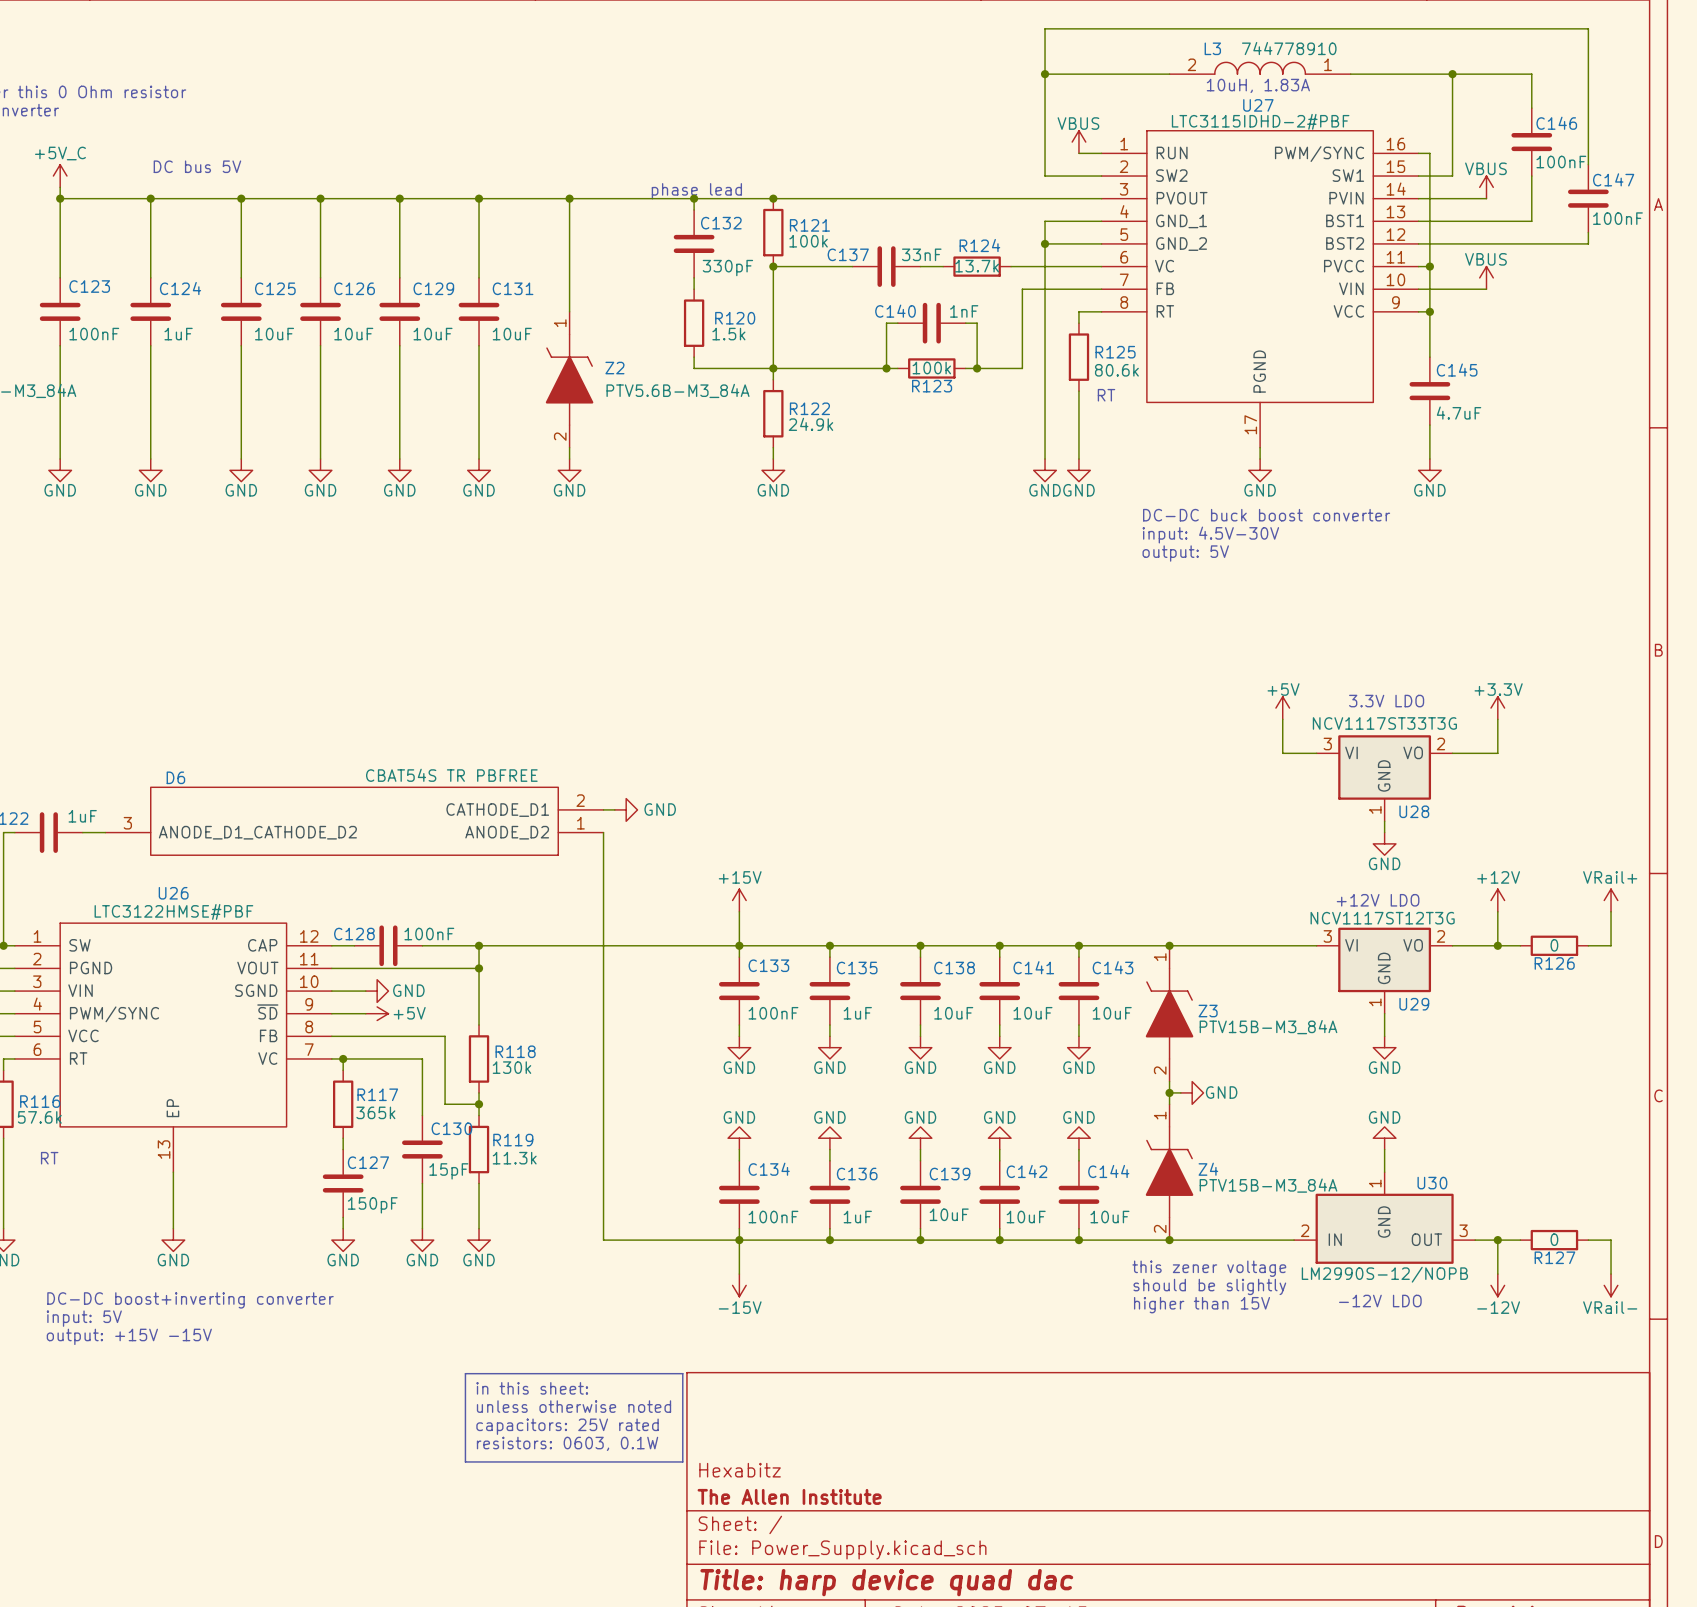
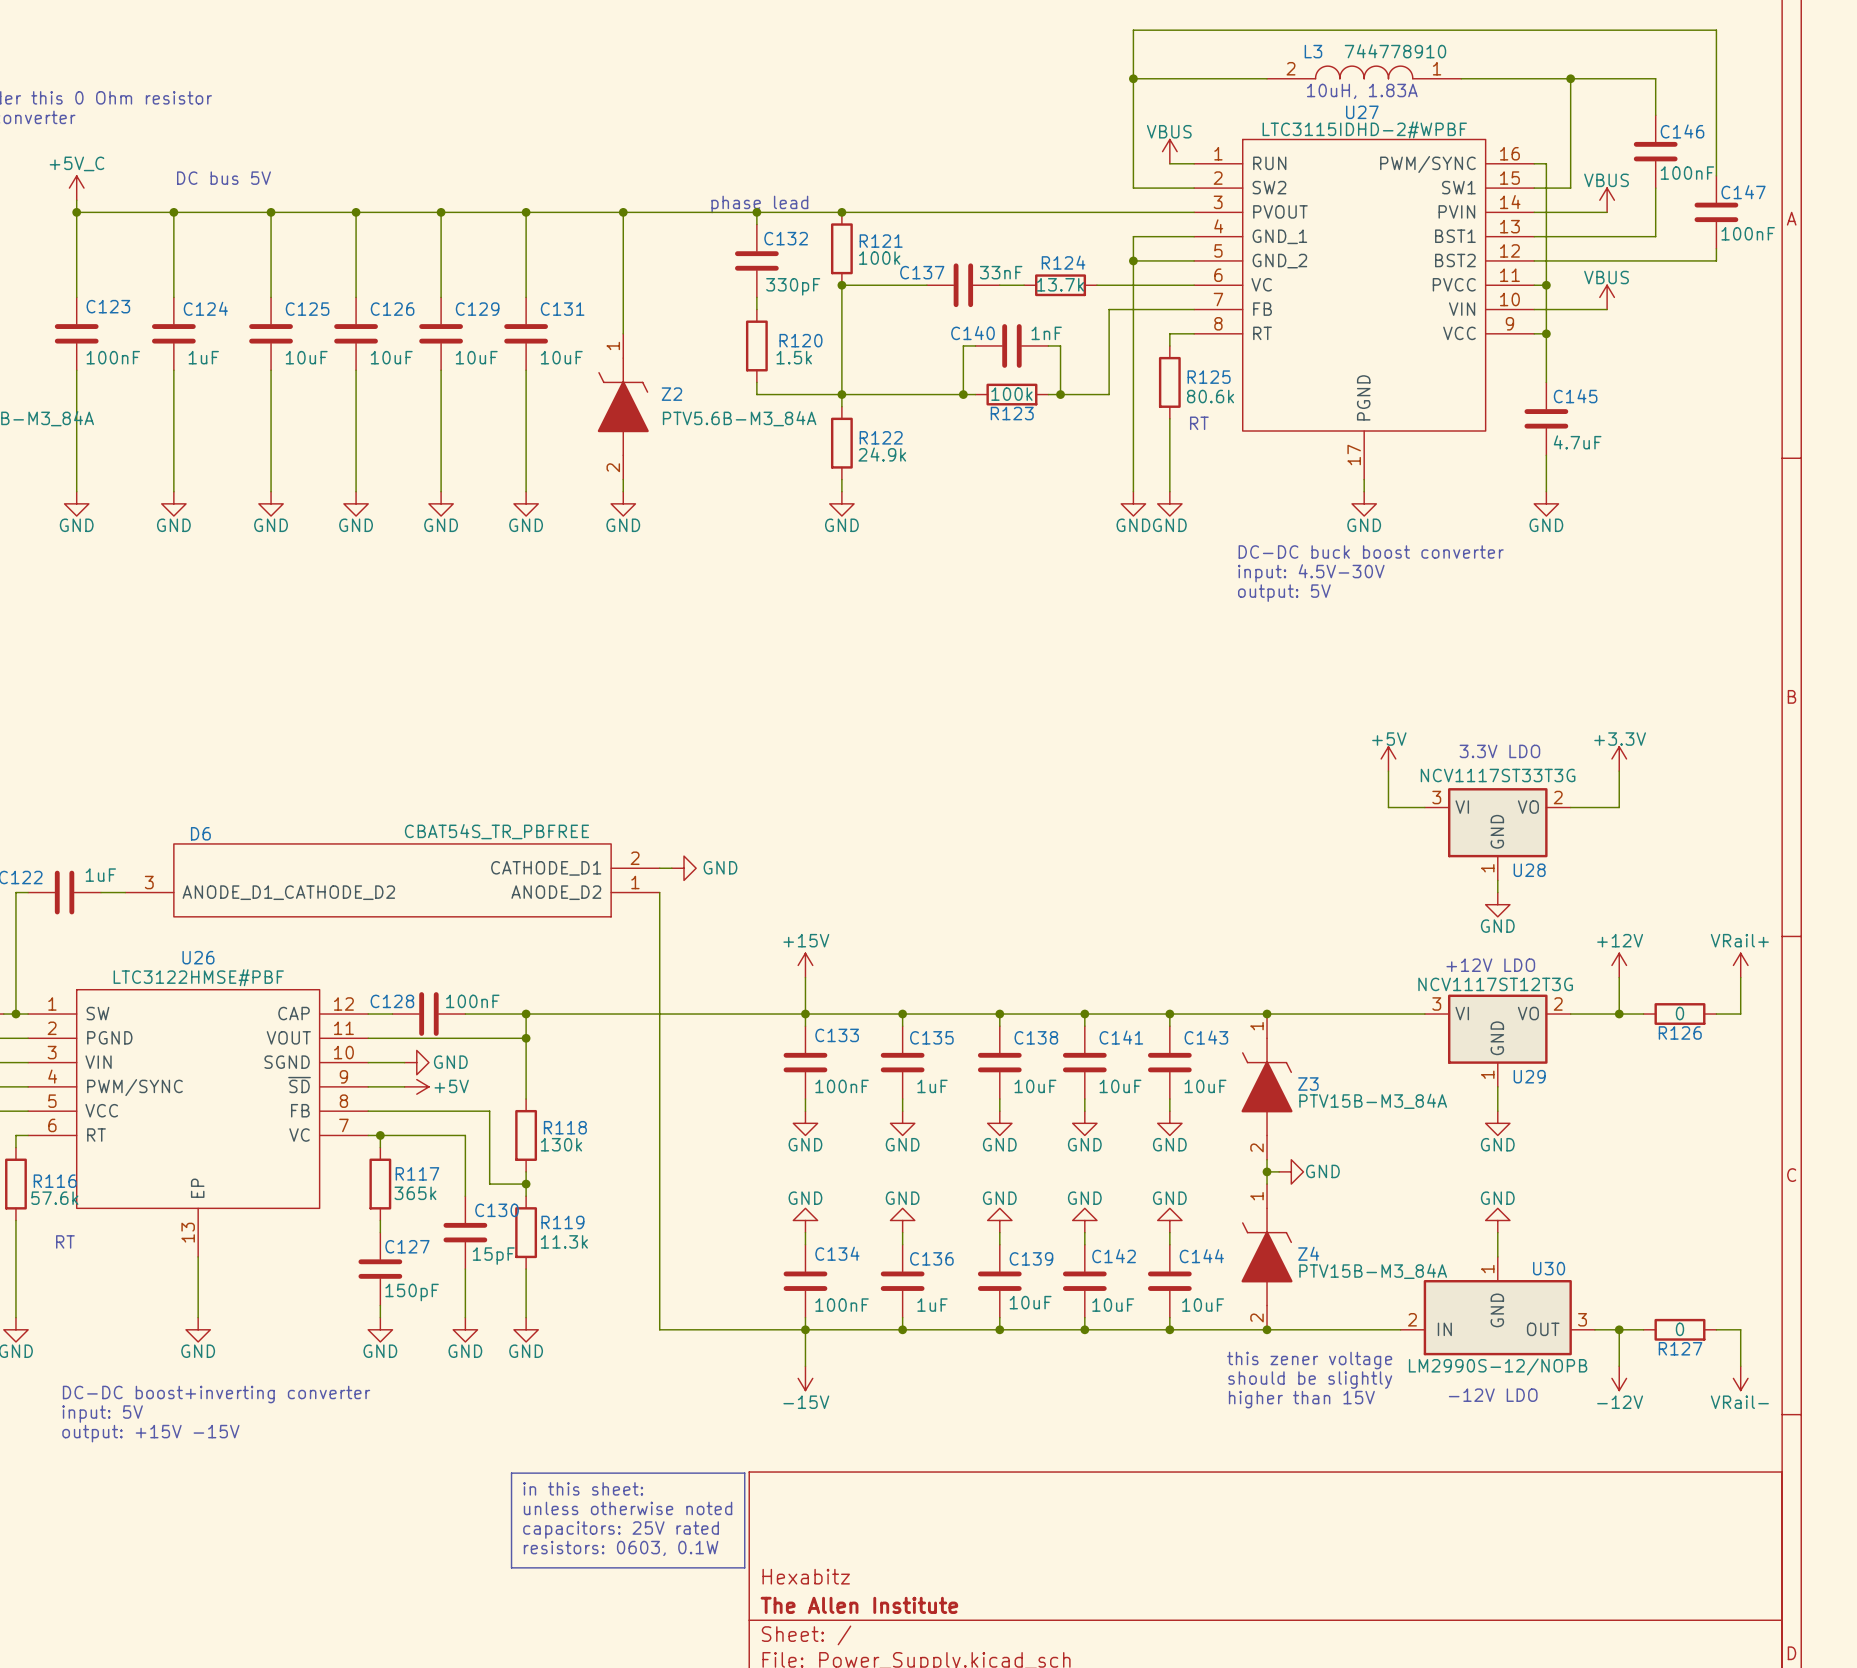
U27 value: LTC3115IDHD-2#PBF (1260, 121) -> LTC3115IDHD-2#WPBF (1364, 129)
D6 value: CBAT54S TR PBFREE (451, 775) -> CBAT54S_TR_PBFREE (496, 831)

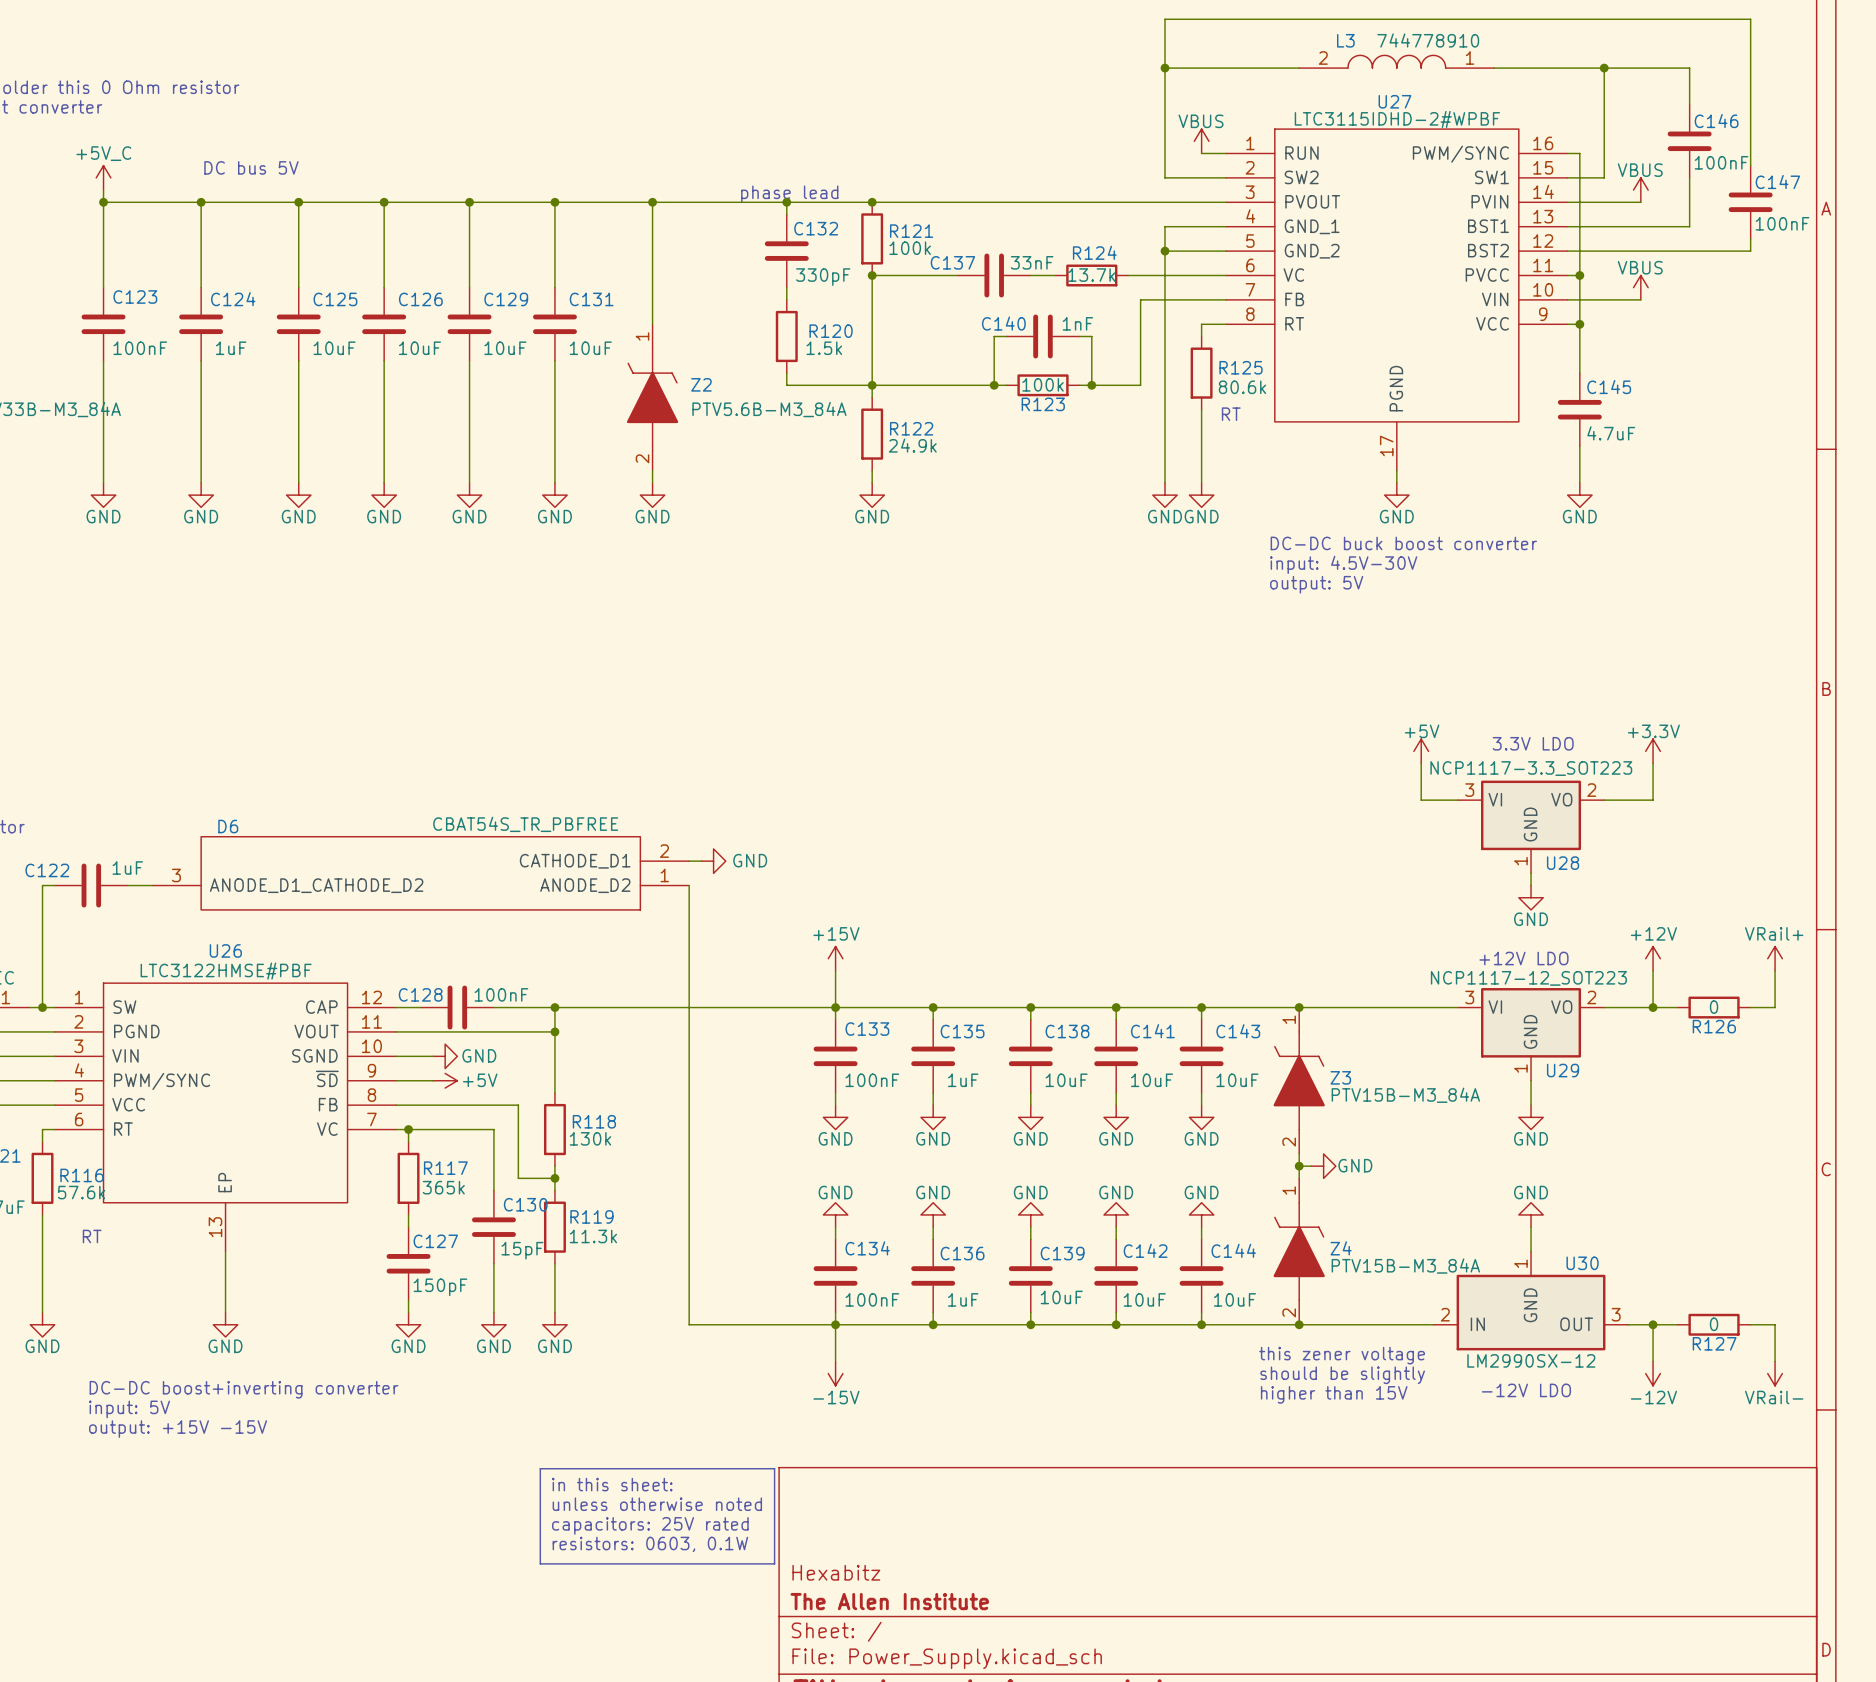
text: 10uH, 1.83A (1362, 91) -> none
U28 value: NCV1117ST33T3G (1498, 775) -> NCP1117-3.3_SOT223 (1531, 768)
U29 value: NCV1117ST12T3G (1495, 984) -> NCP1117-12_SOT223 (1528, 978)
U30 value: LM2990S-12/NOPB (1498, 1366) -> LM2990SX-12 (1531, 1360)

